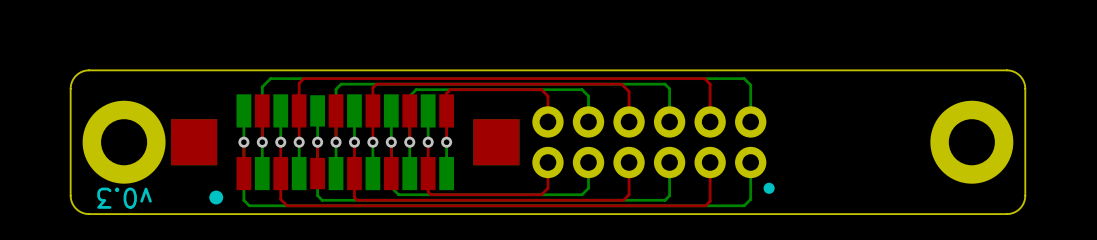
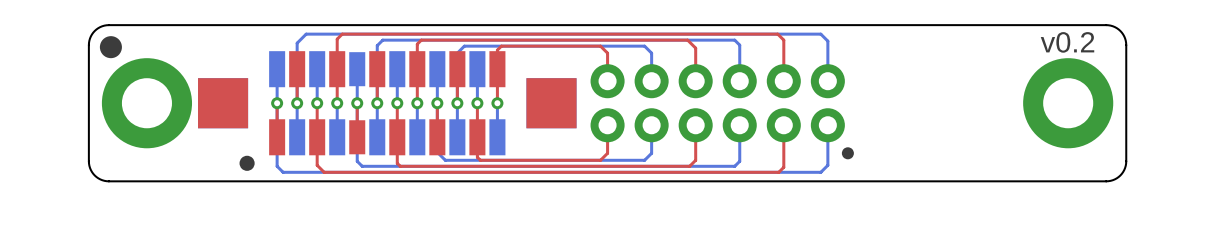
drawing: none -> [99, 36, 122, 59]
text: none -> v0.2 (1067, 42)
text: v0.3 (124, 198) -> none

